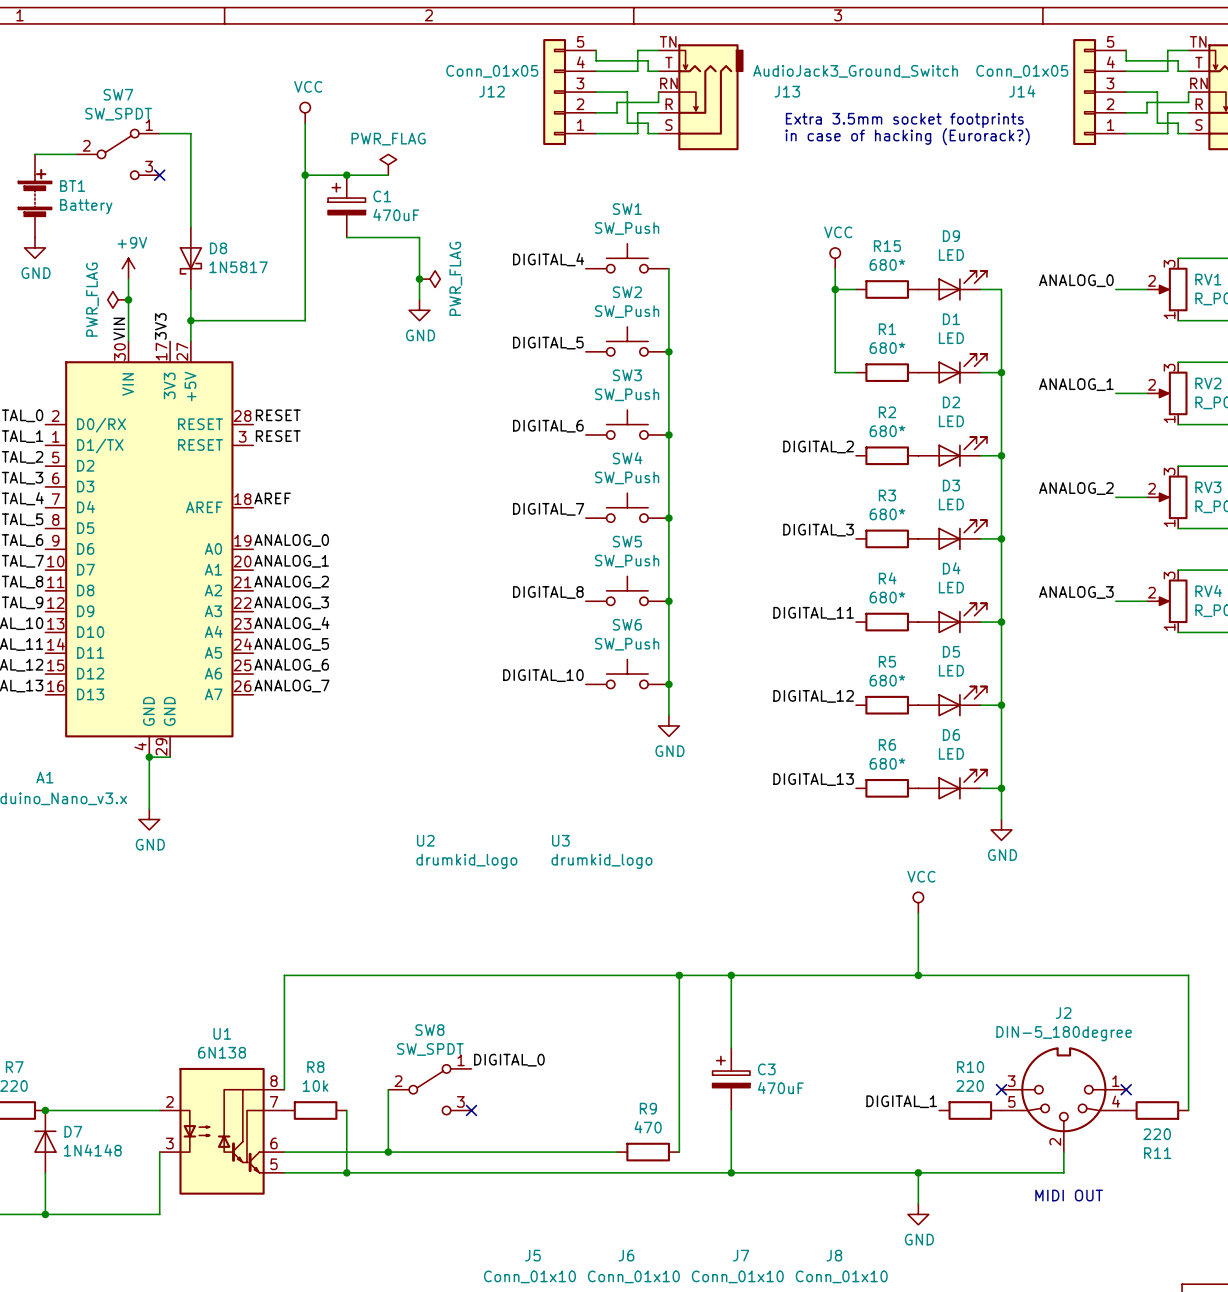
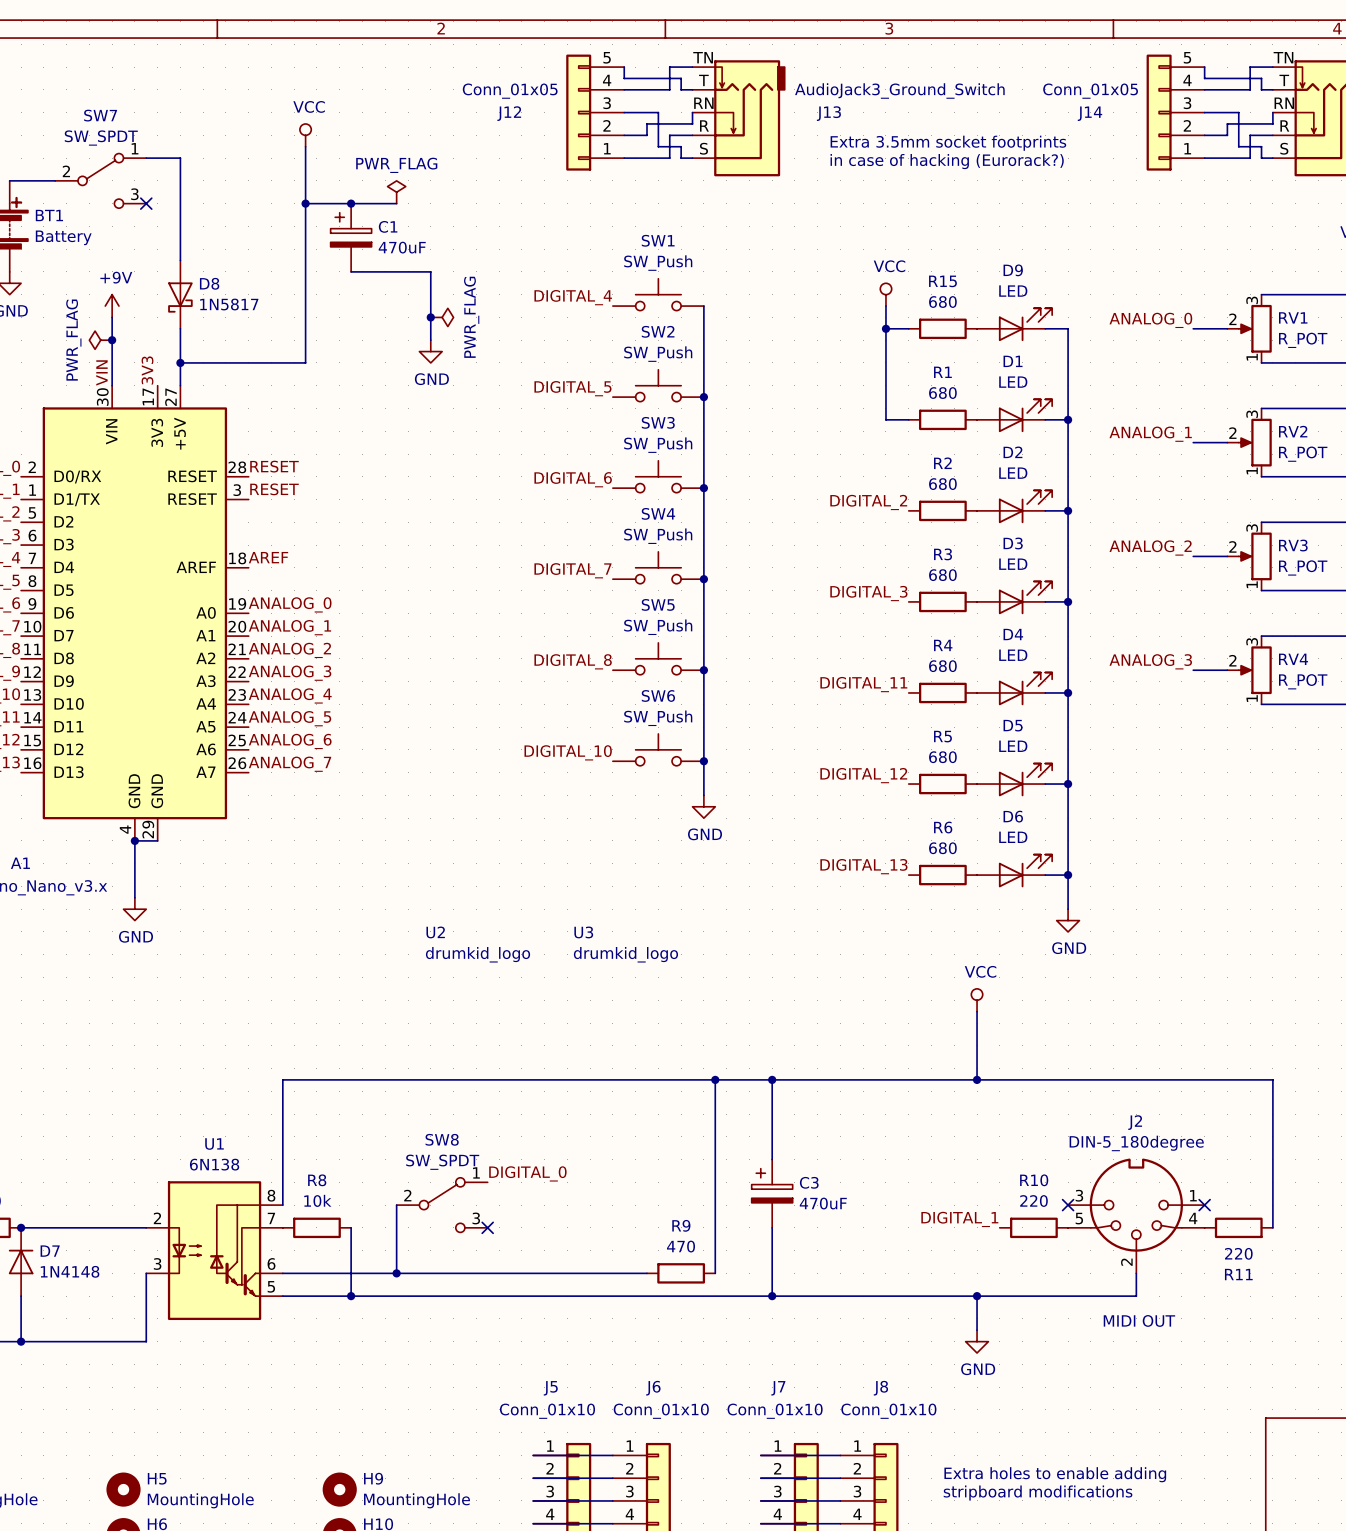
R15 value: 680* (887, 264) -> 680 (942, 302)
R1 value: 680* (887, 348) -> 680 (942, 393)
R2 value: 680* (887, 431) -> 680 (942, 484)
R3 value: 680* (887, 514) -> 680 (942, 575)
R4 value: 680* (887, 597) -> 680 (942, 666)
R5 value: 680* (887, 680) -> 680 (942, 757)
R6 value: 680* (887, 763) -> 680 (942, 848)

